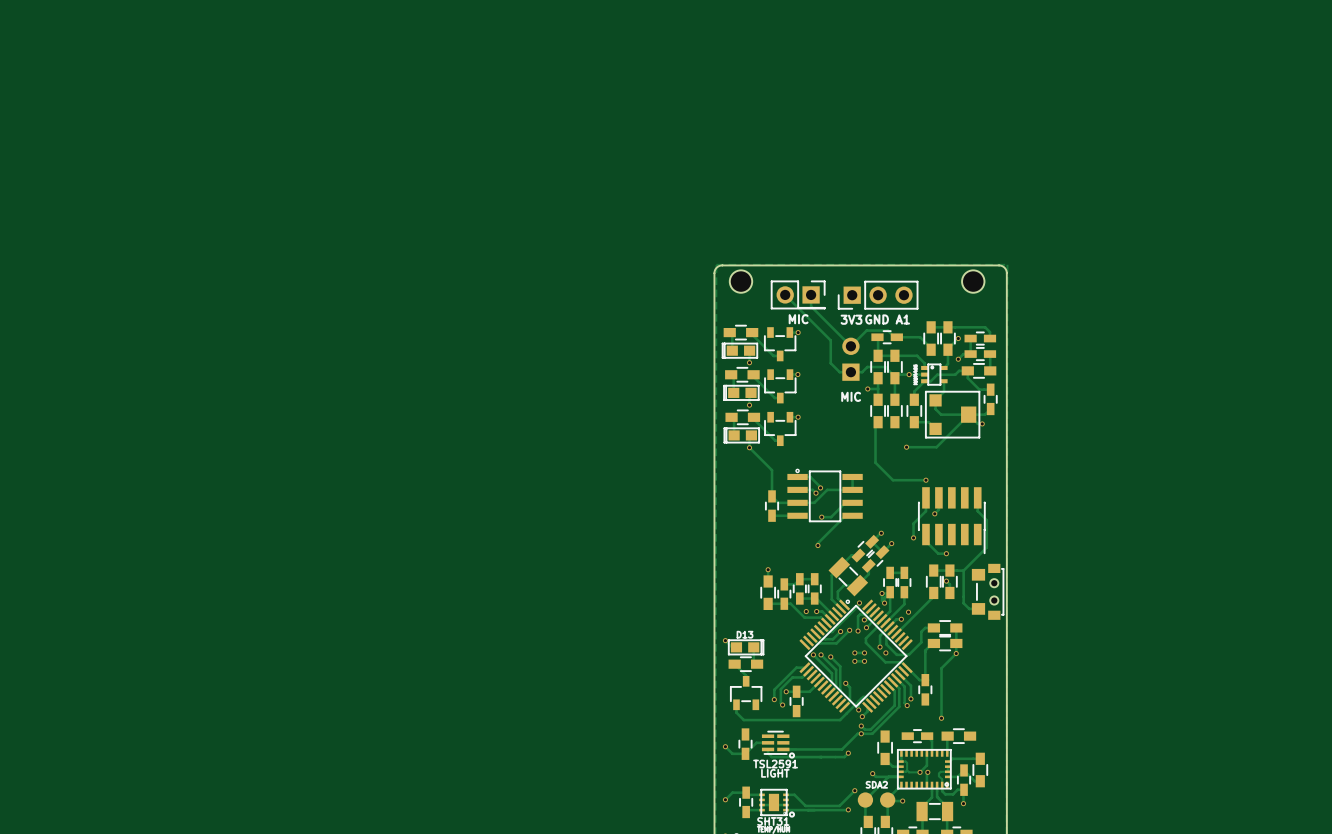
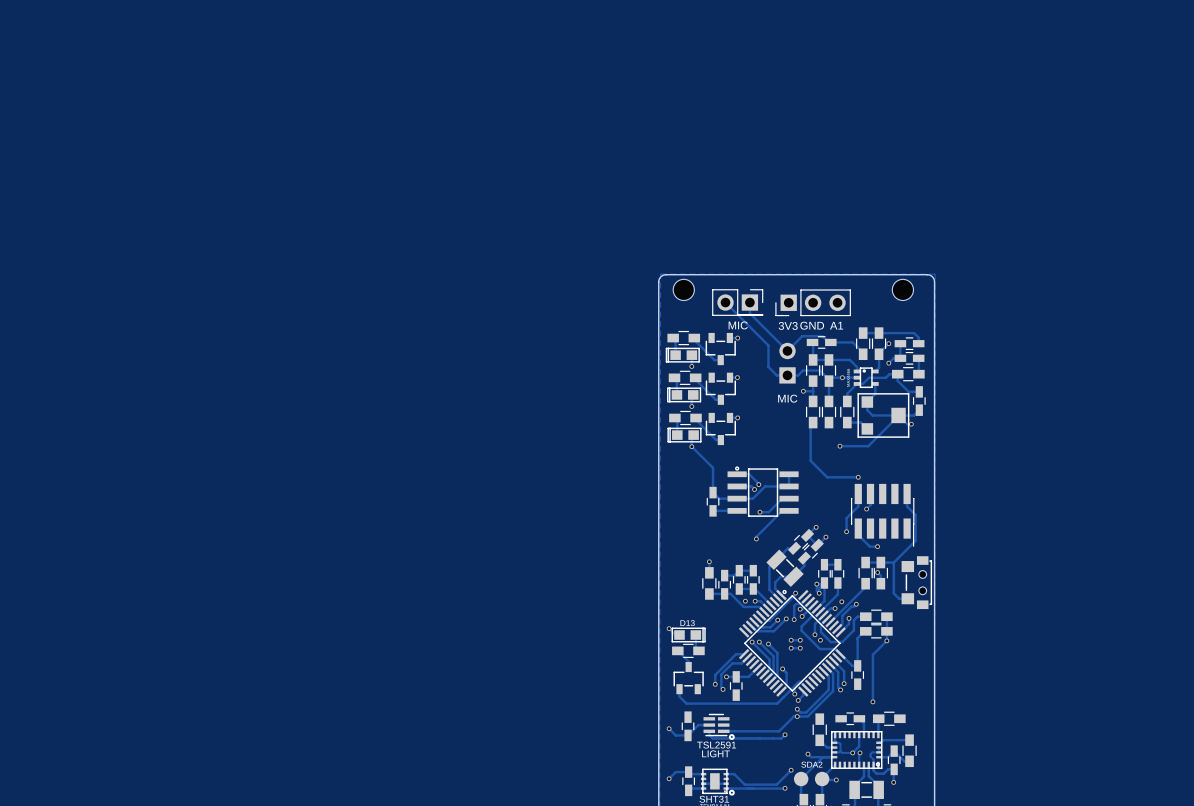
track: none -> (856, 604) (842, 615) (842, 623) (837, 629)
via: none -> (856, 604)
track: none -> (849, 618) (849, 624) (840, 632)
via: none -> (849, 618)

